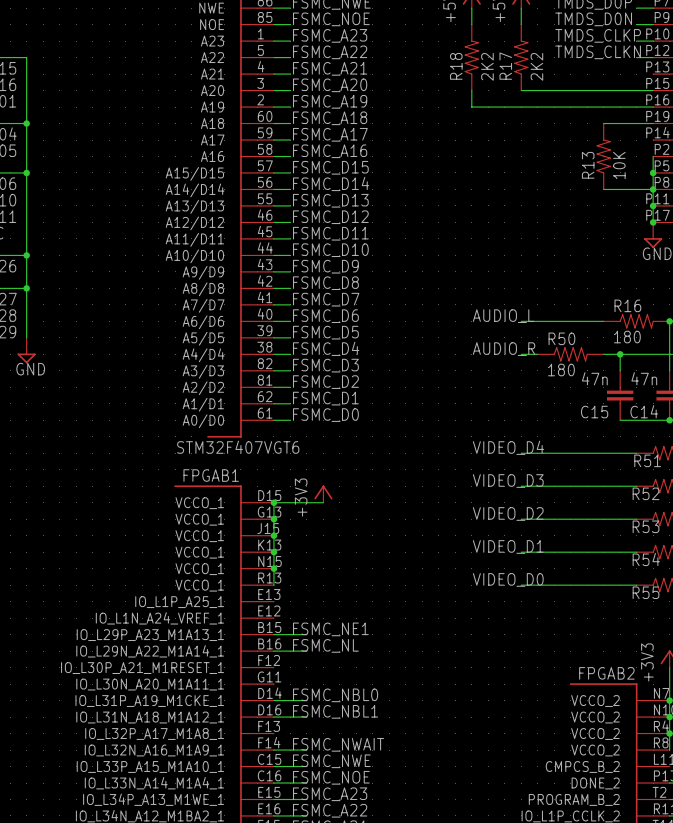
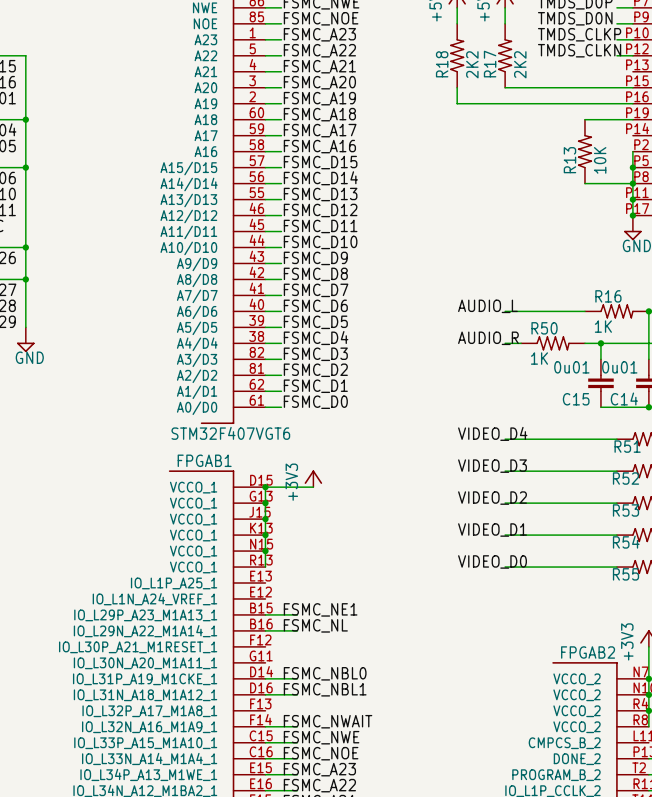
R16 value: 180 (627, 337) -> 1K (603, 326)
R50 value: 180 (561, 370) -> 1K (539, 358)
C15 value: 47n (594, 378) -> 0u01 (571, 367)
C14 value: 47n (644, 378) -> 0u01 (619, 367)

